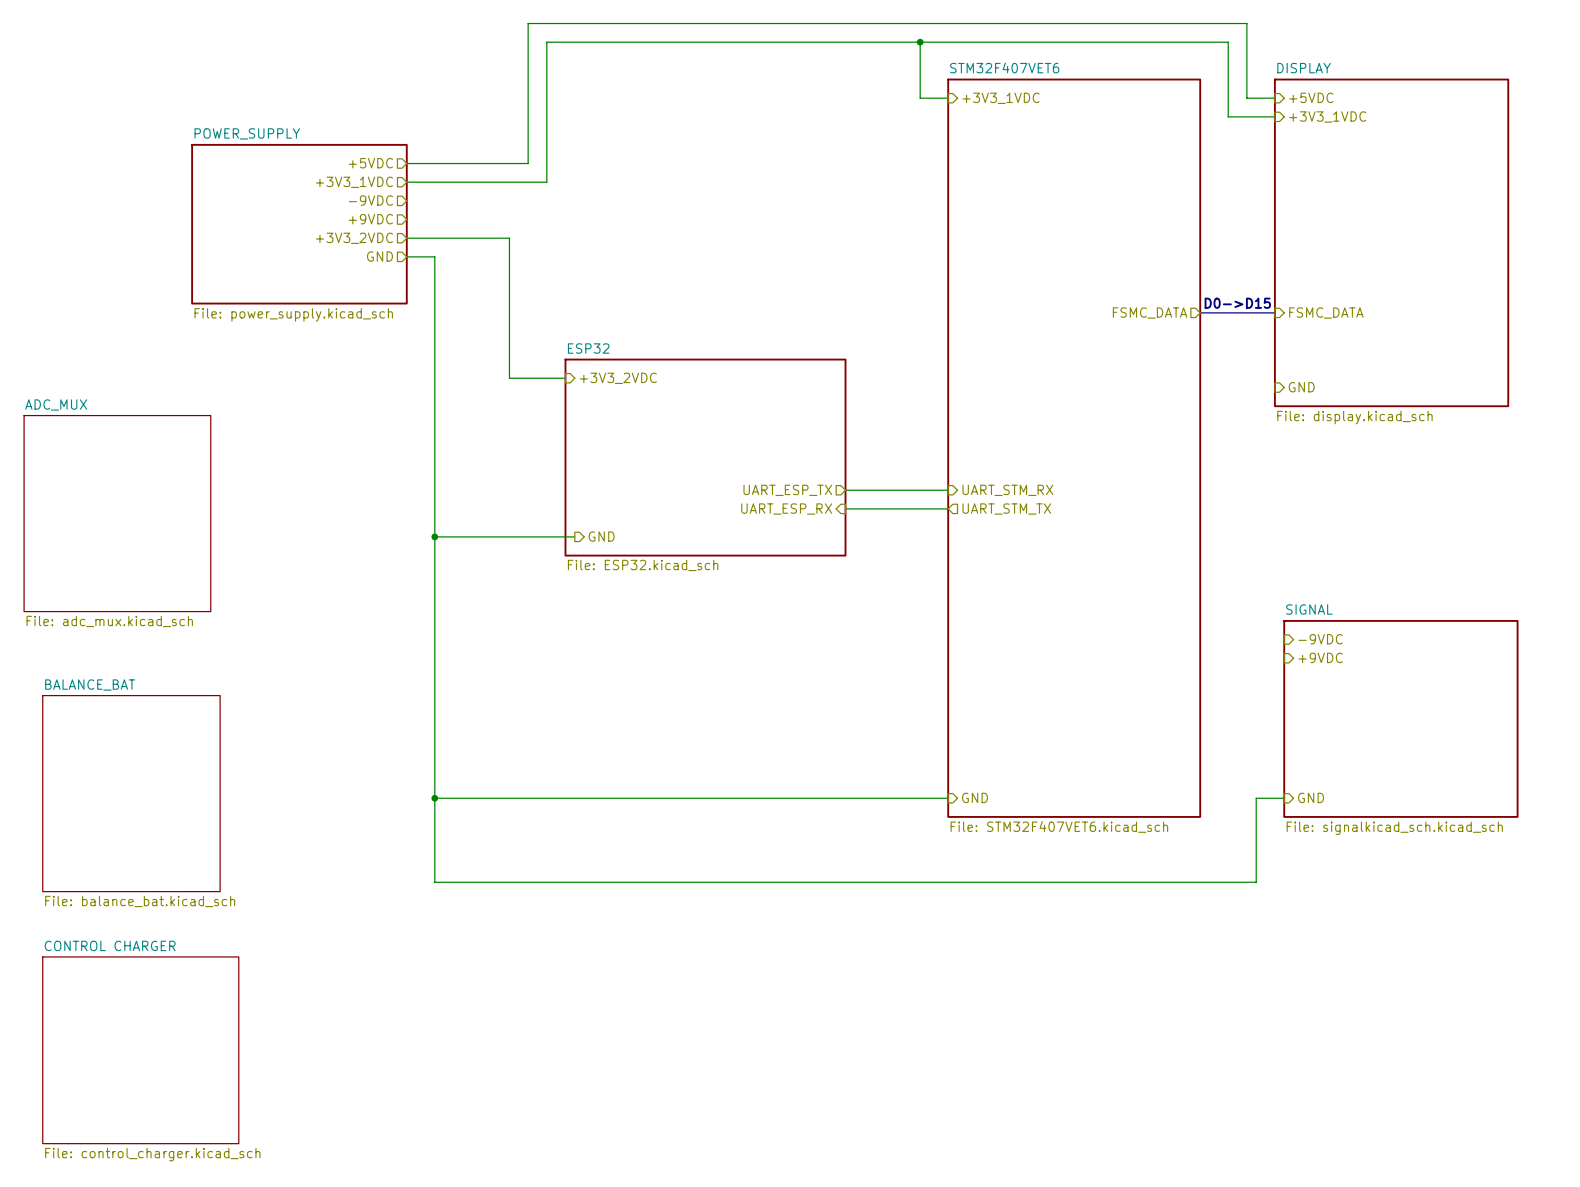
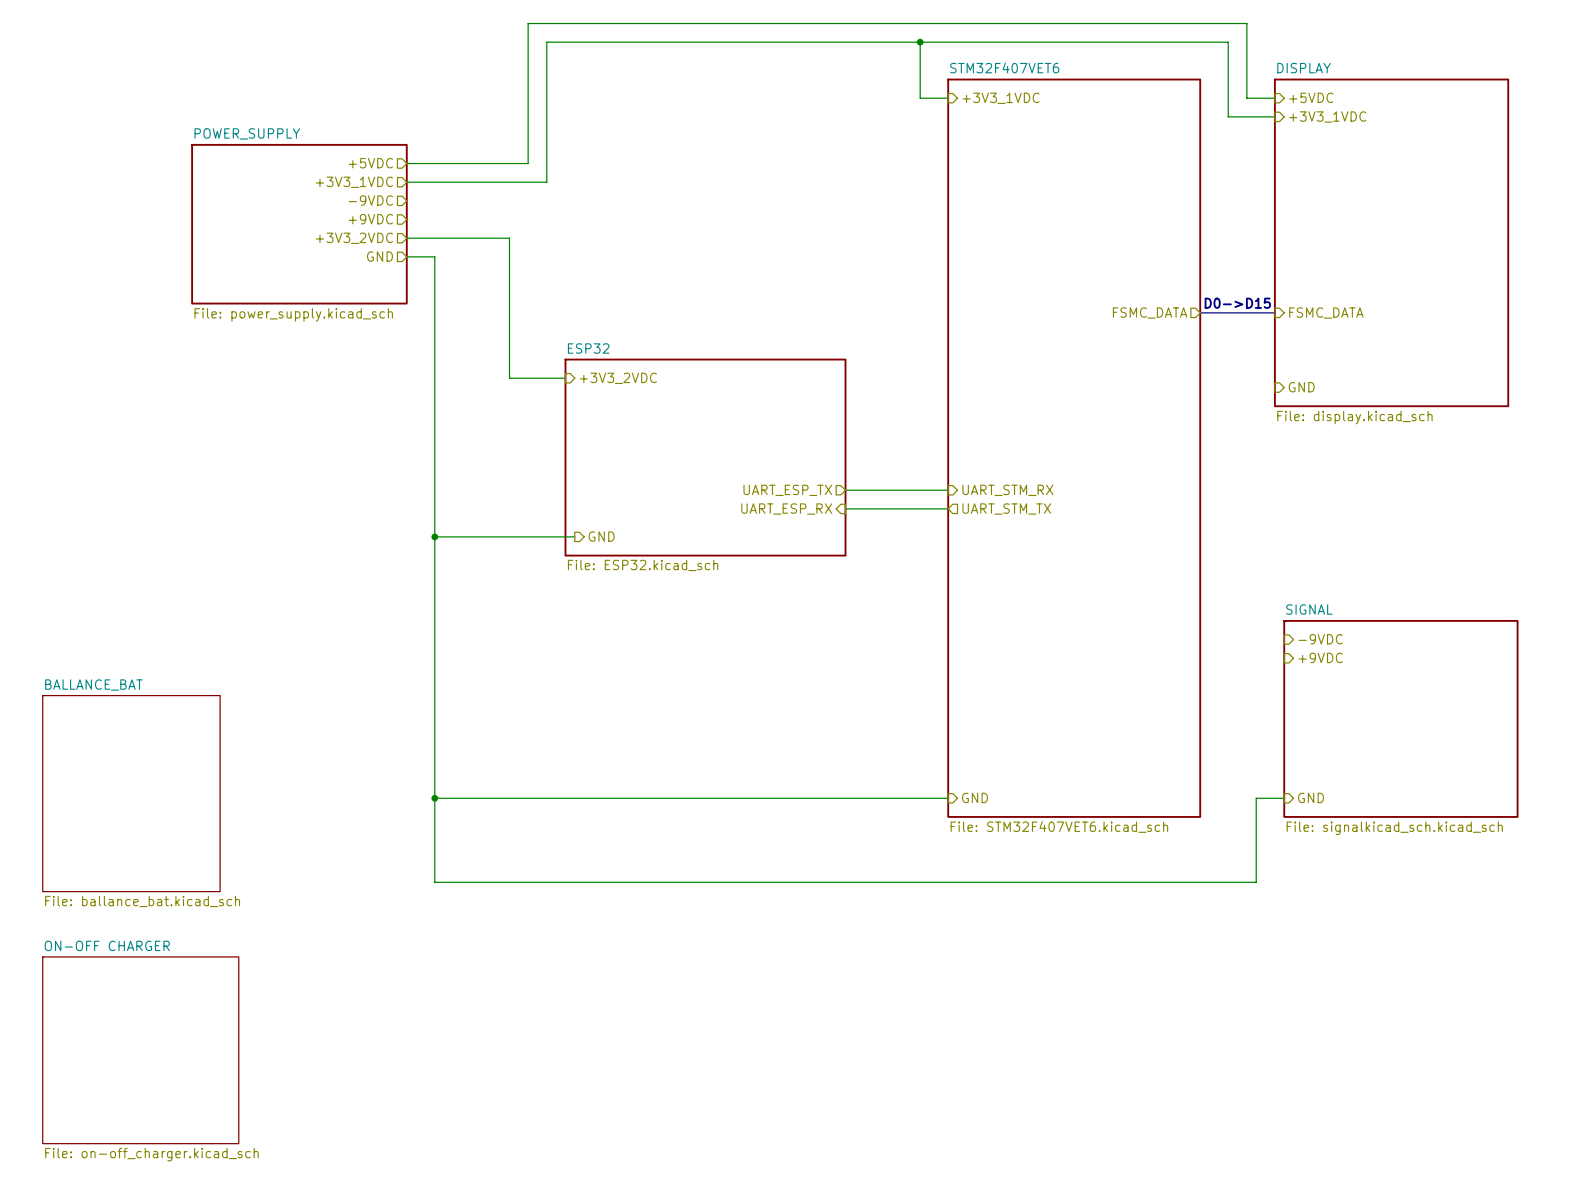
sheet ADC_MUX: File: adc_mux.kicad_sch (117, 513) -> none
sheet BALANCE_BAT name: BALANCE_BAT (90, 685) -> BALLANCE_BAT (93, 685)
sheet BALANCE_BAT value: File: balance_bat.kicad_sch (140, 901) -> File: ballance_bat.kicad_sch (142, 901)
sheet CONTROL CHARGER name: CONTROL CHARGER (110, 945) -> ON-OFF CHARGER (107, 945)
sheet CONTROL CHARGER value: File: control_charger.kicad_sch (152, 1154) -> File: on-off_charger.kicad_sch (151, 1154)

